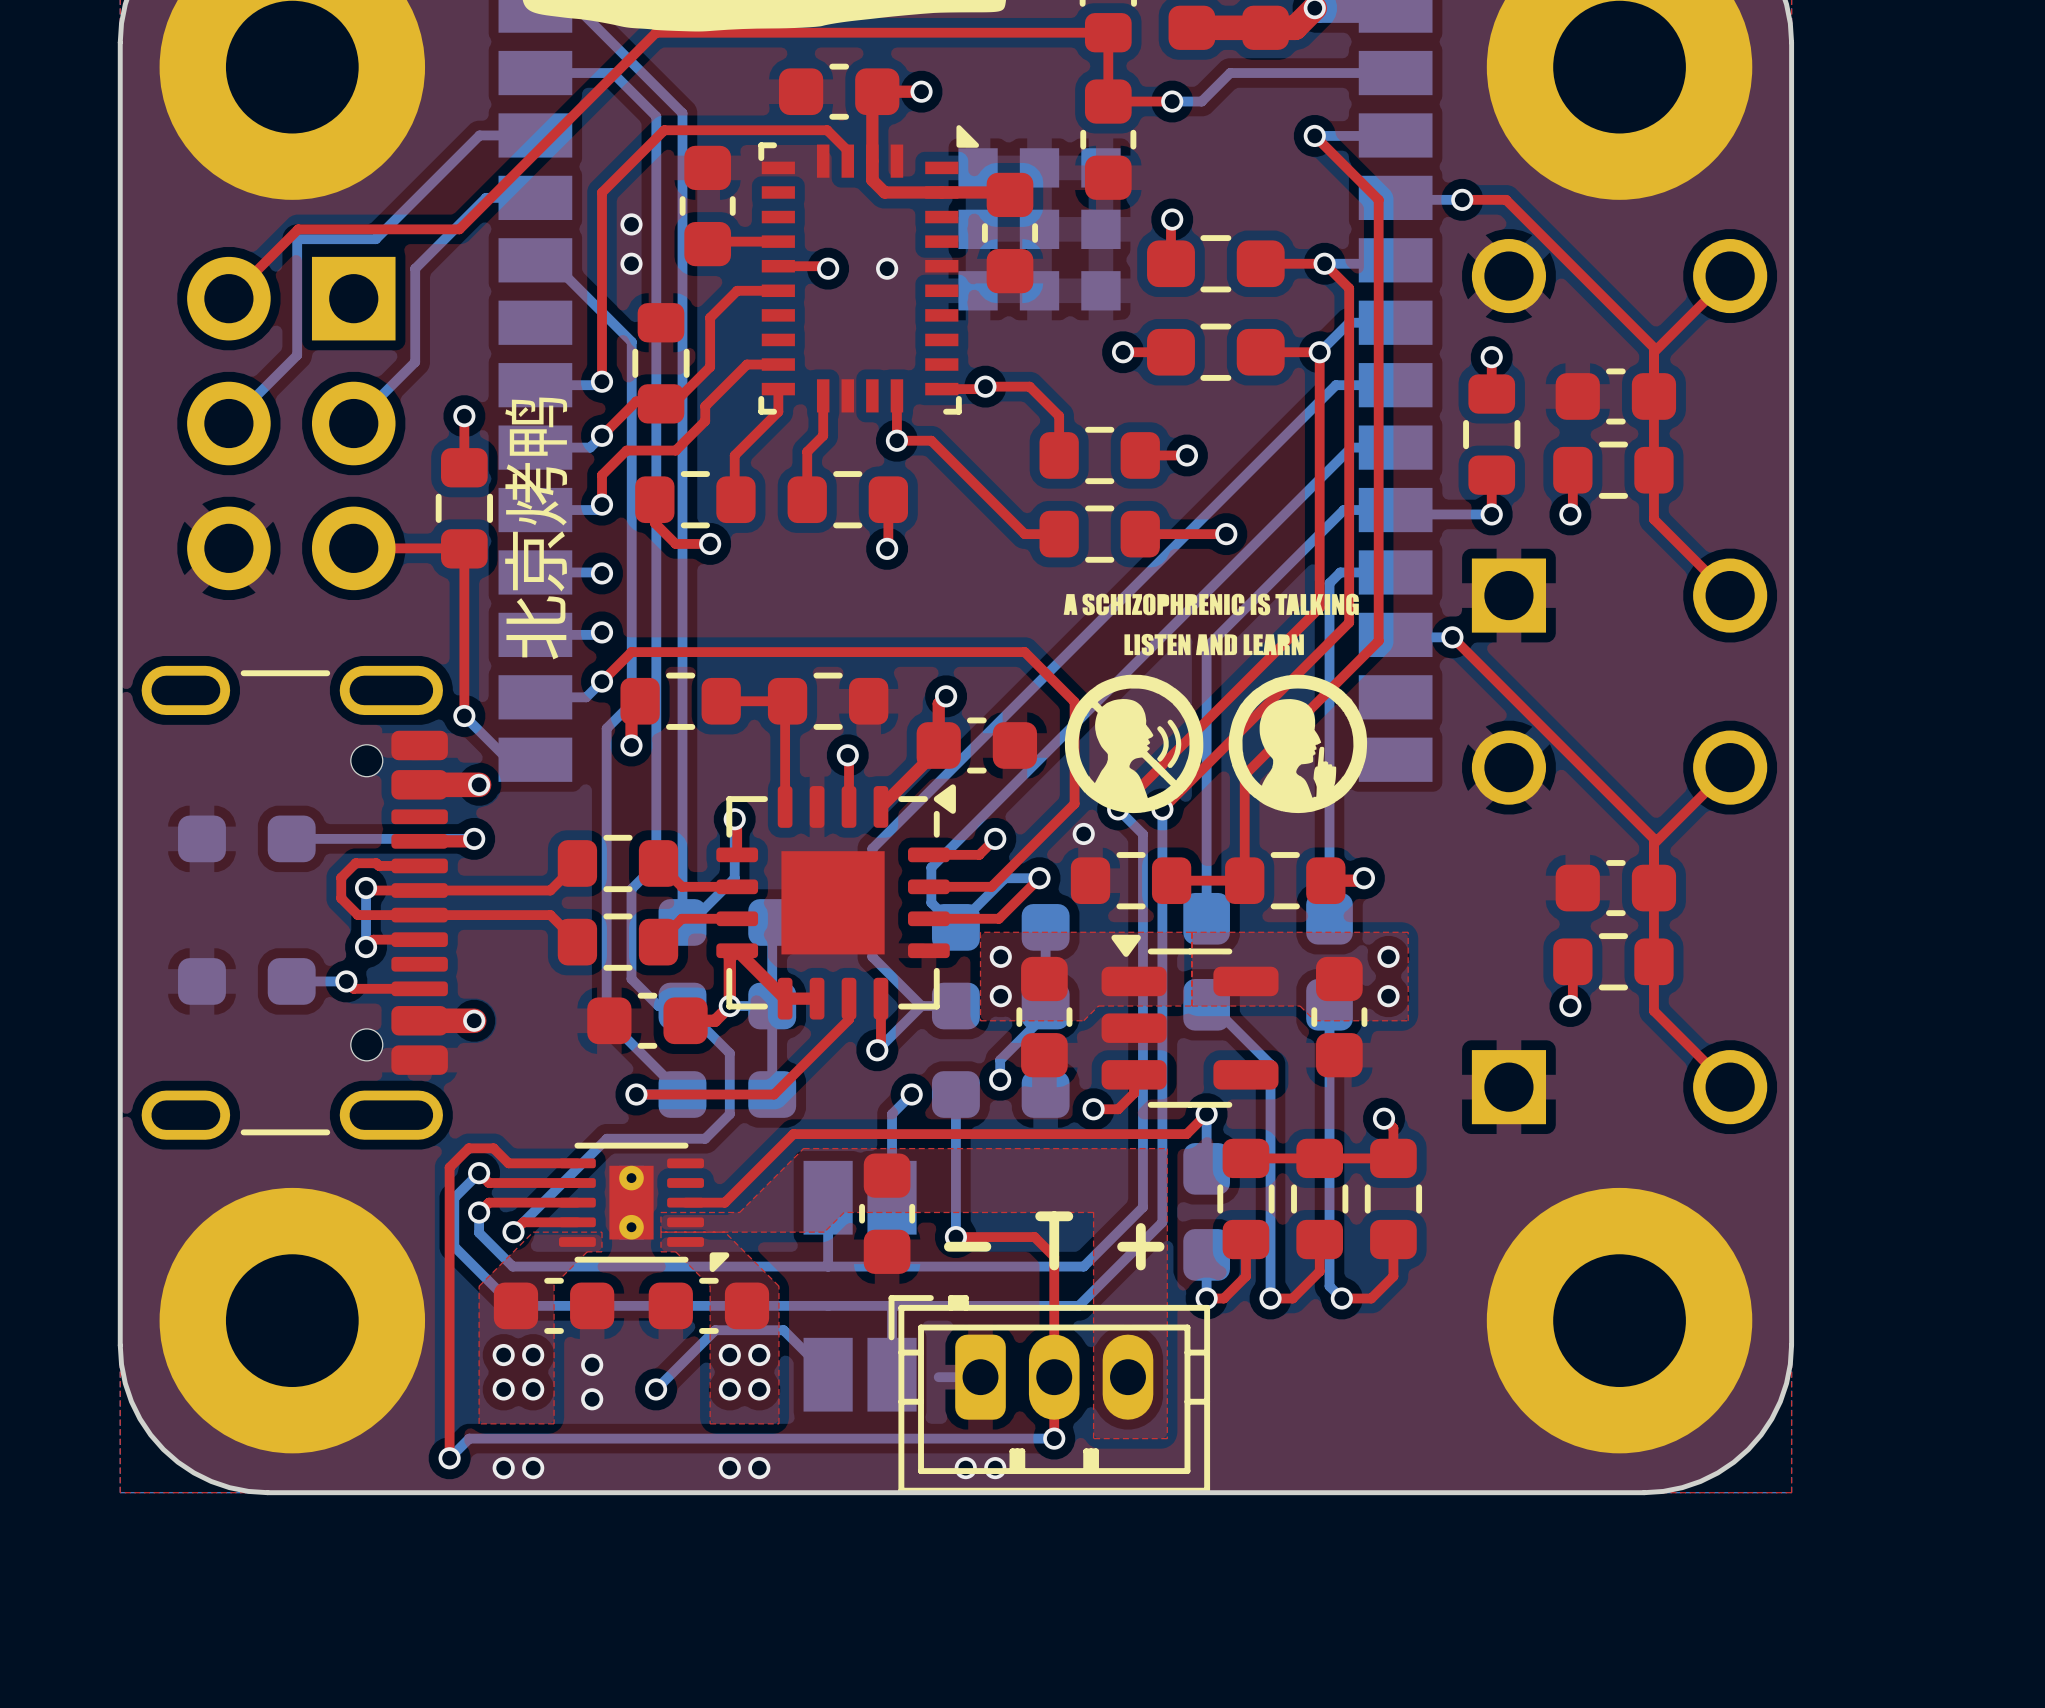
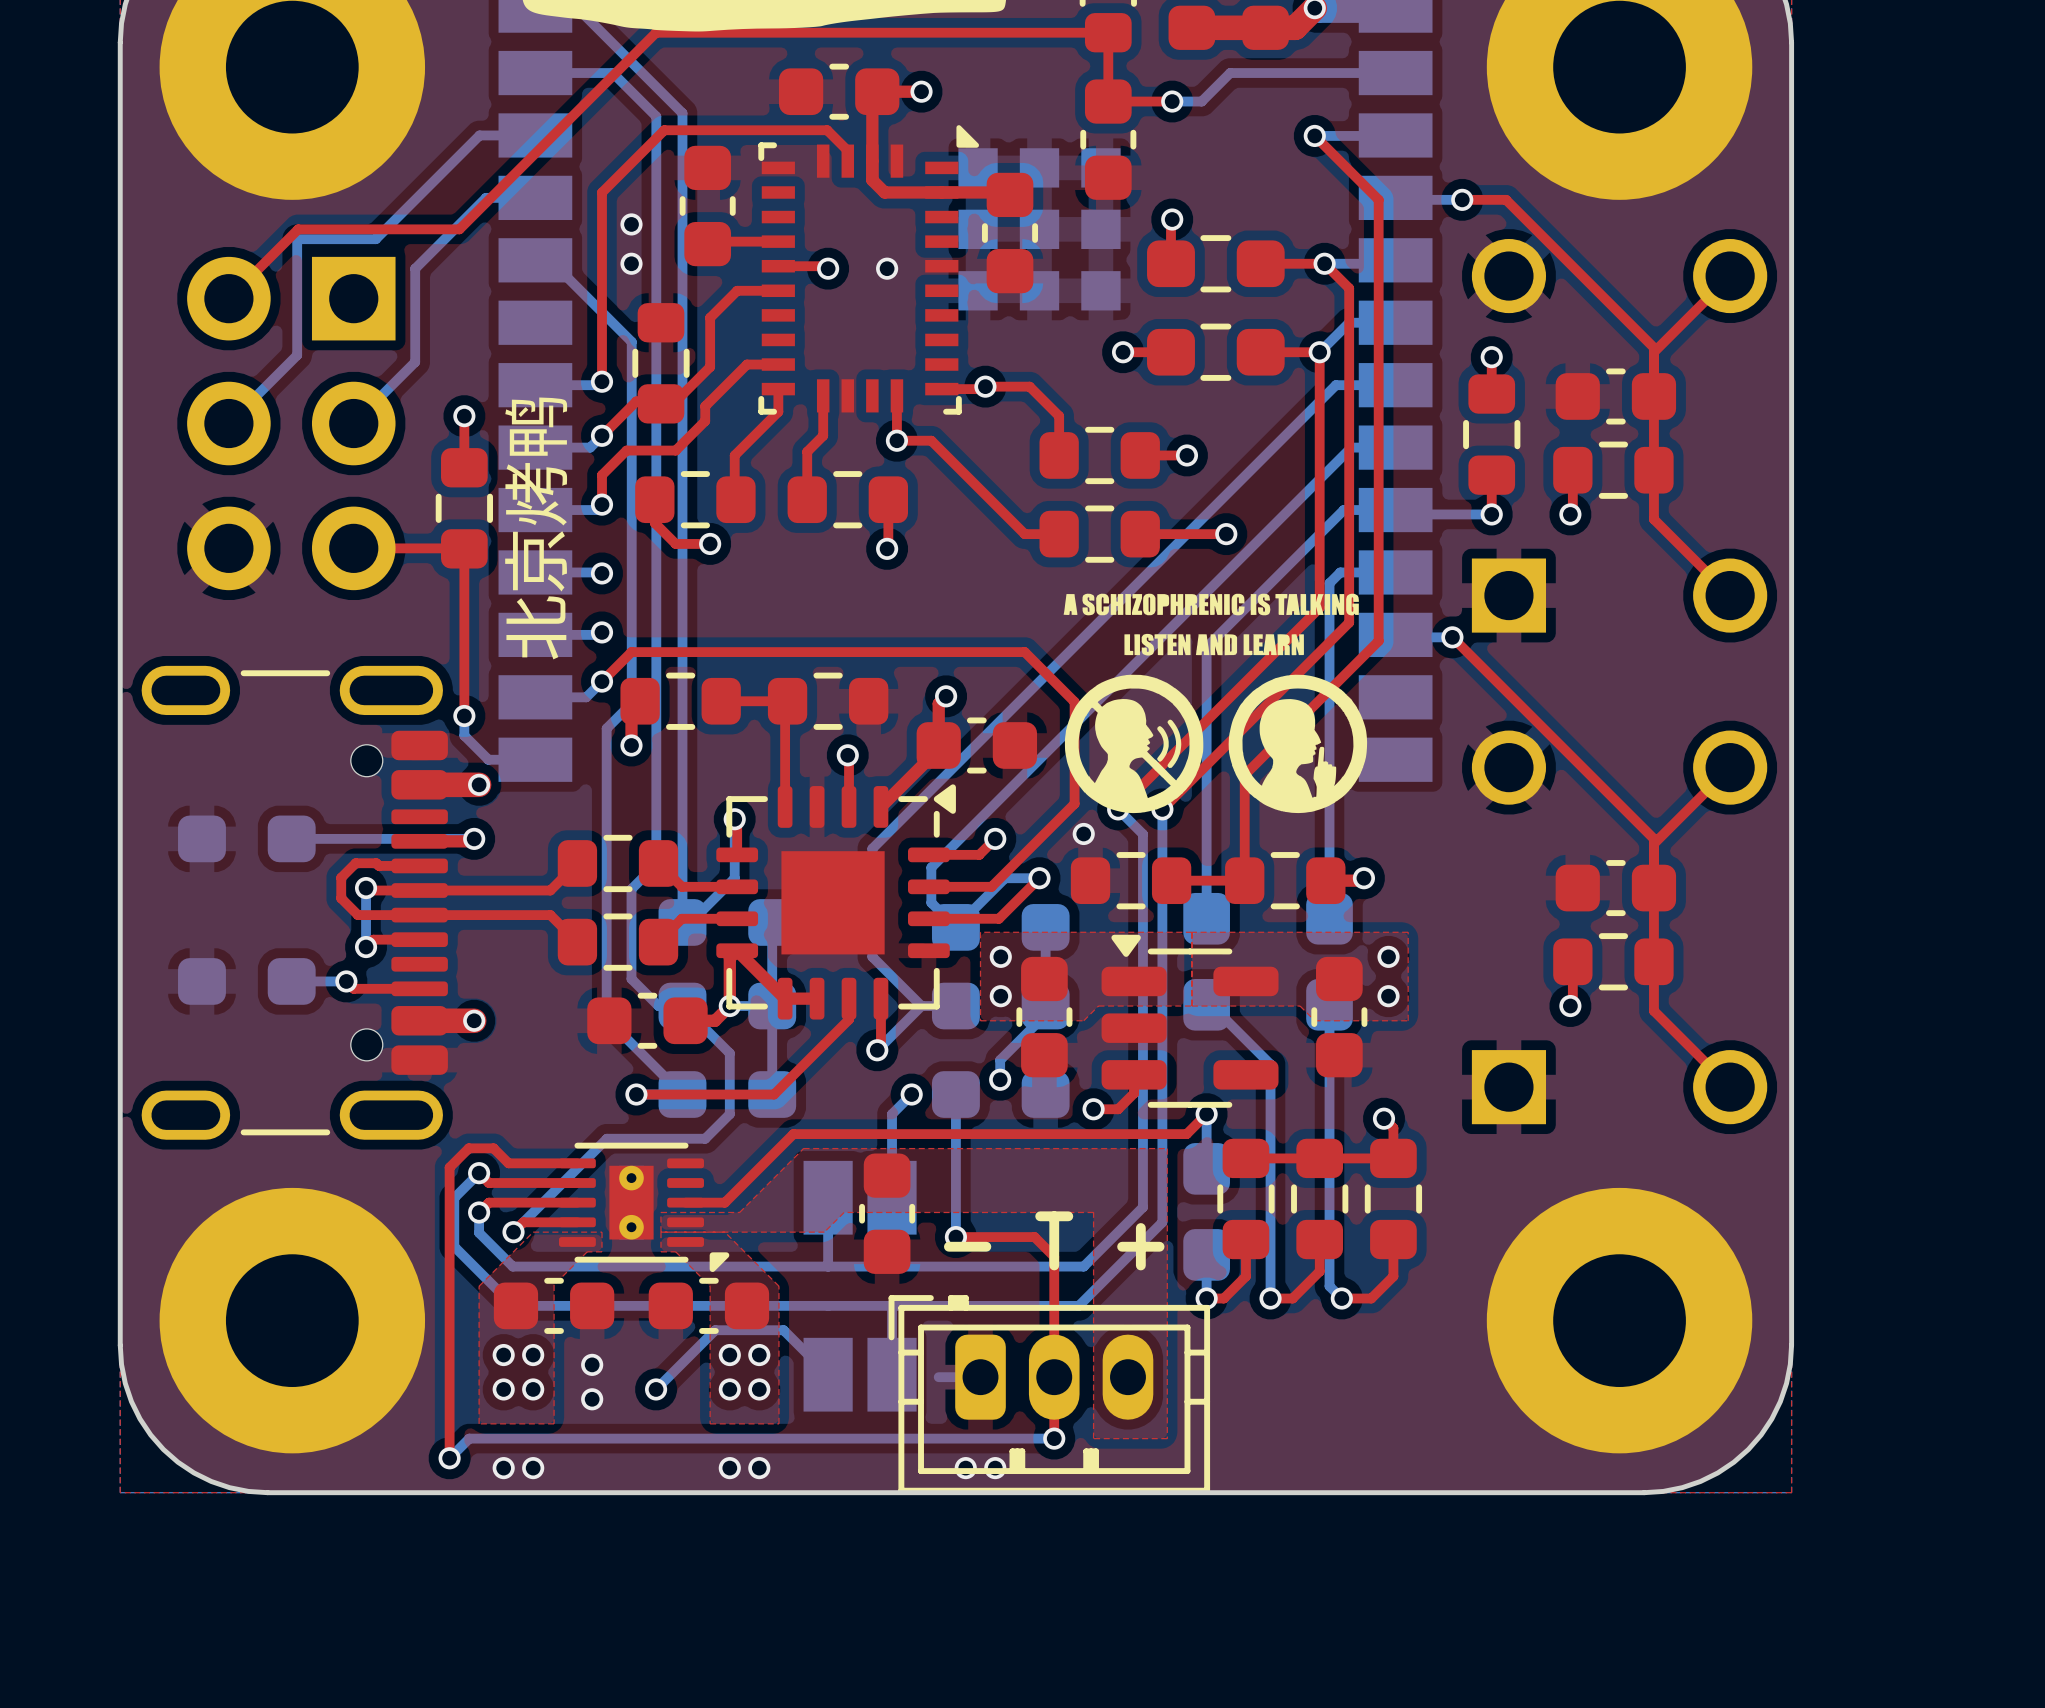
bottom track: (464, 716) (508, 759) -> (464, 716) (464, 735) (488, 759) (508, 759)

